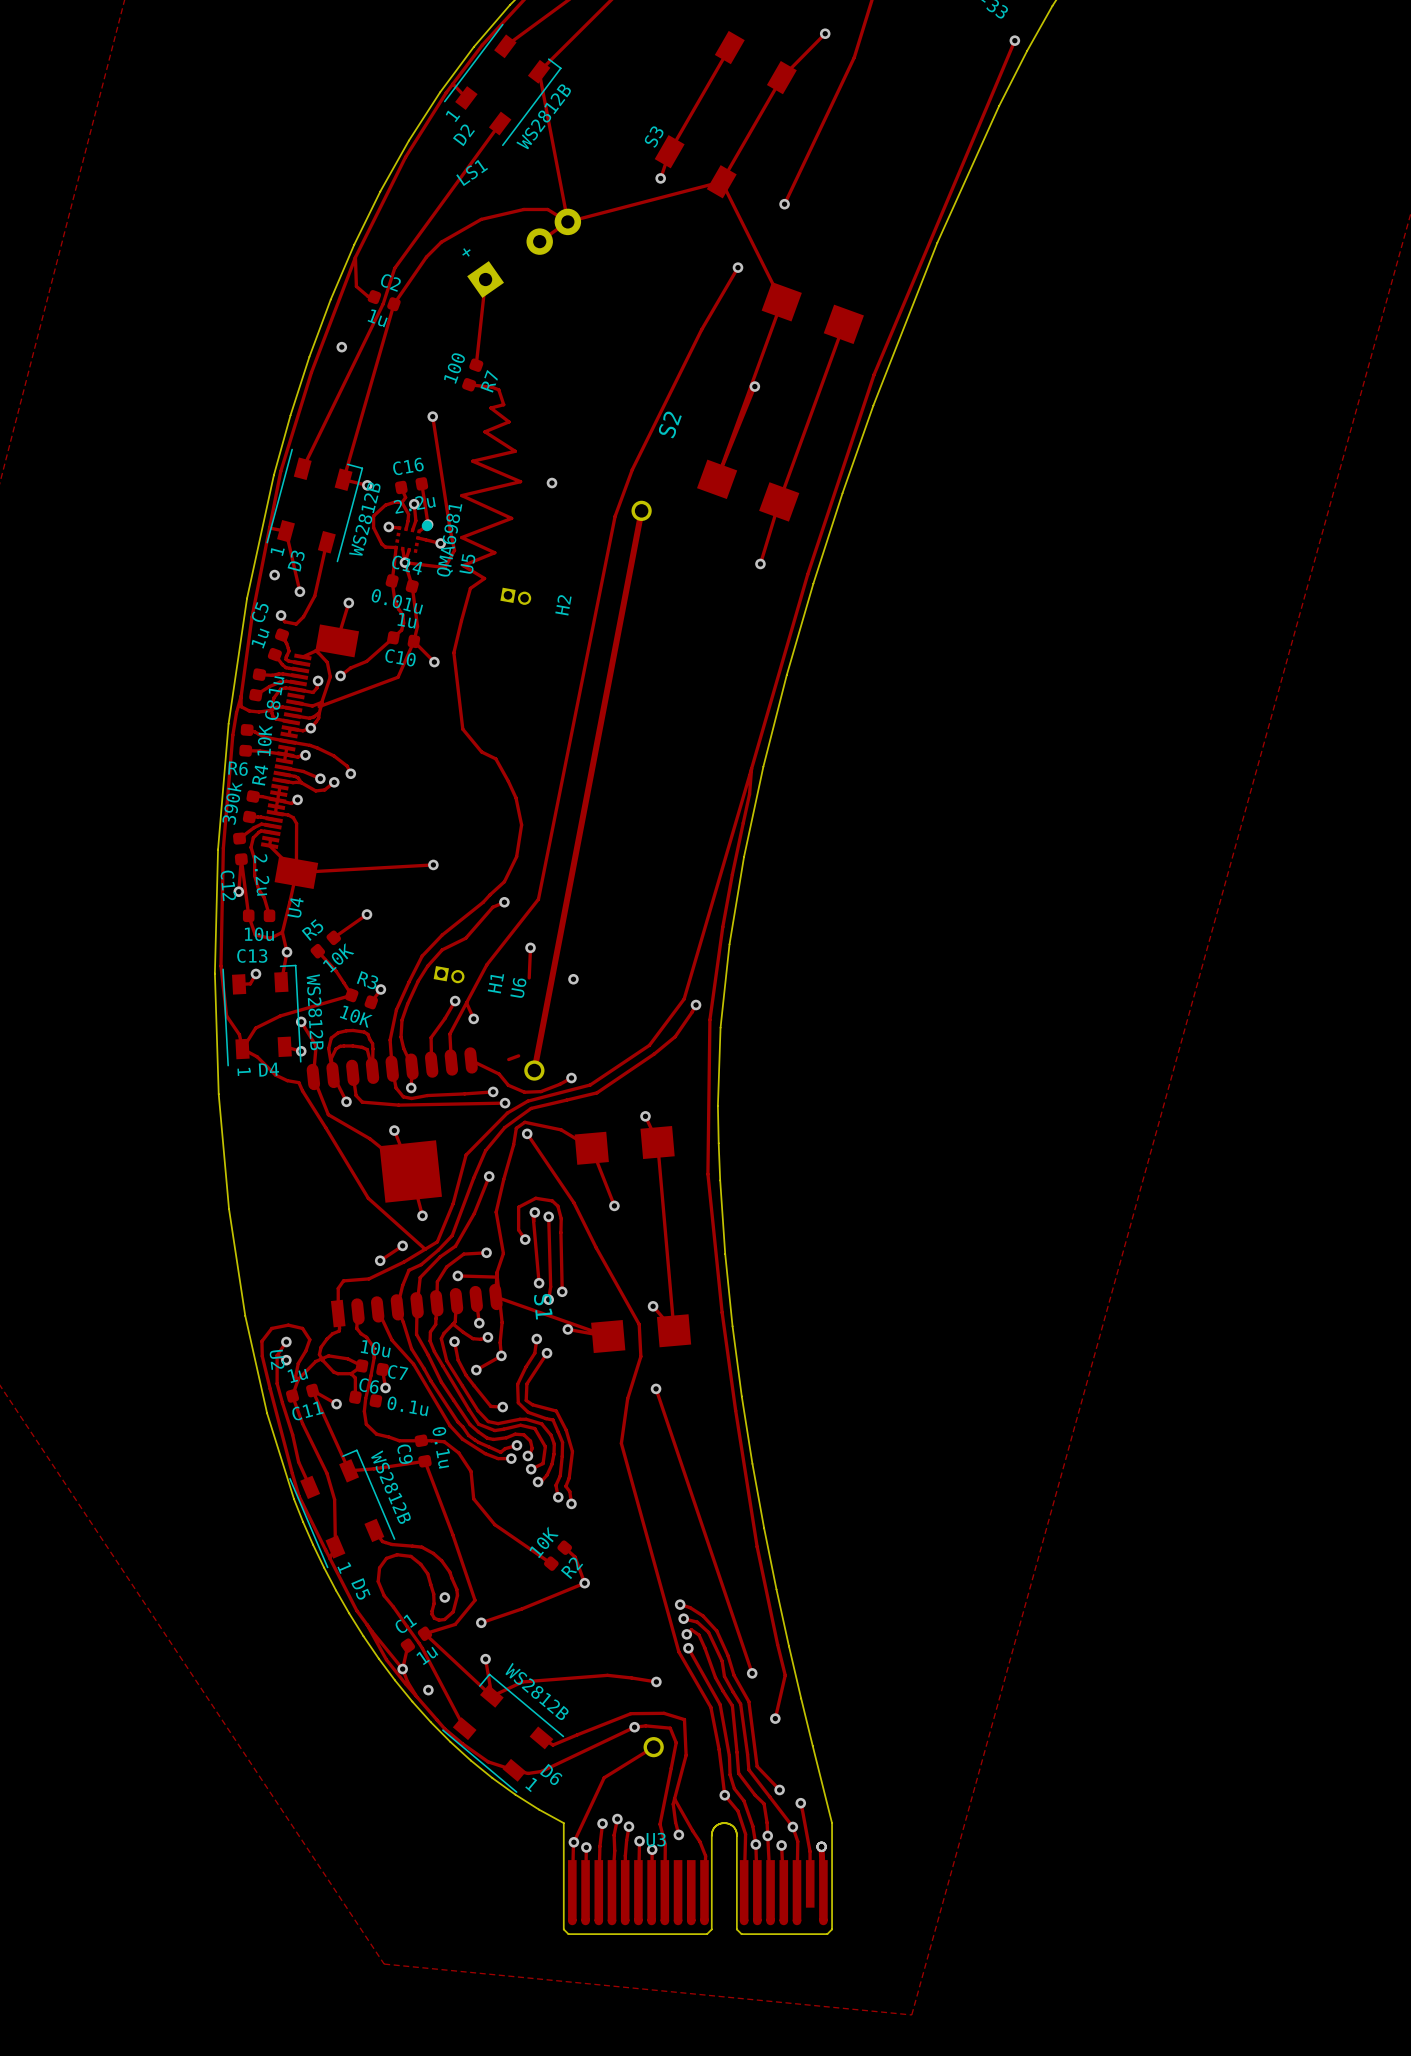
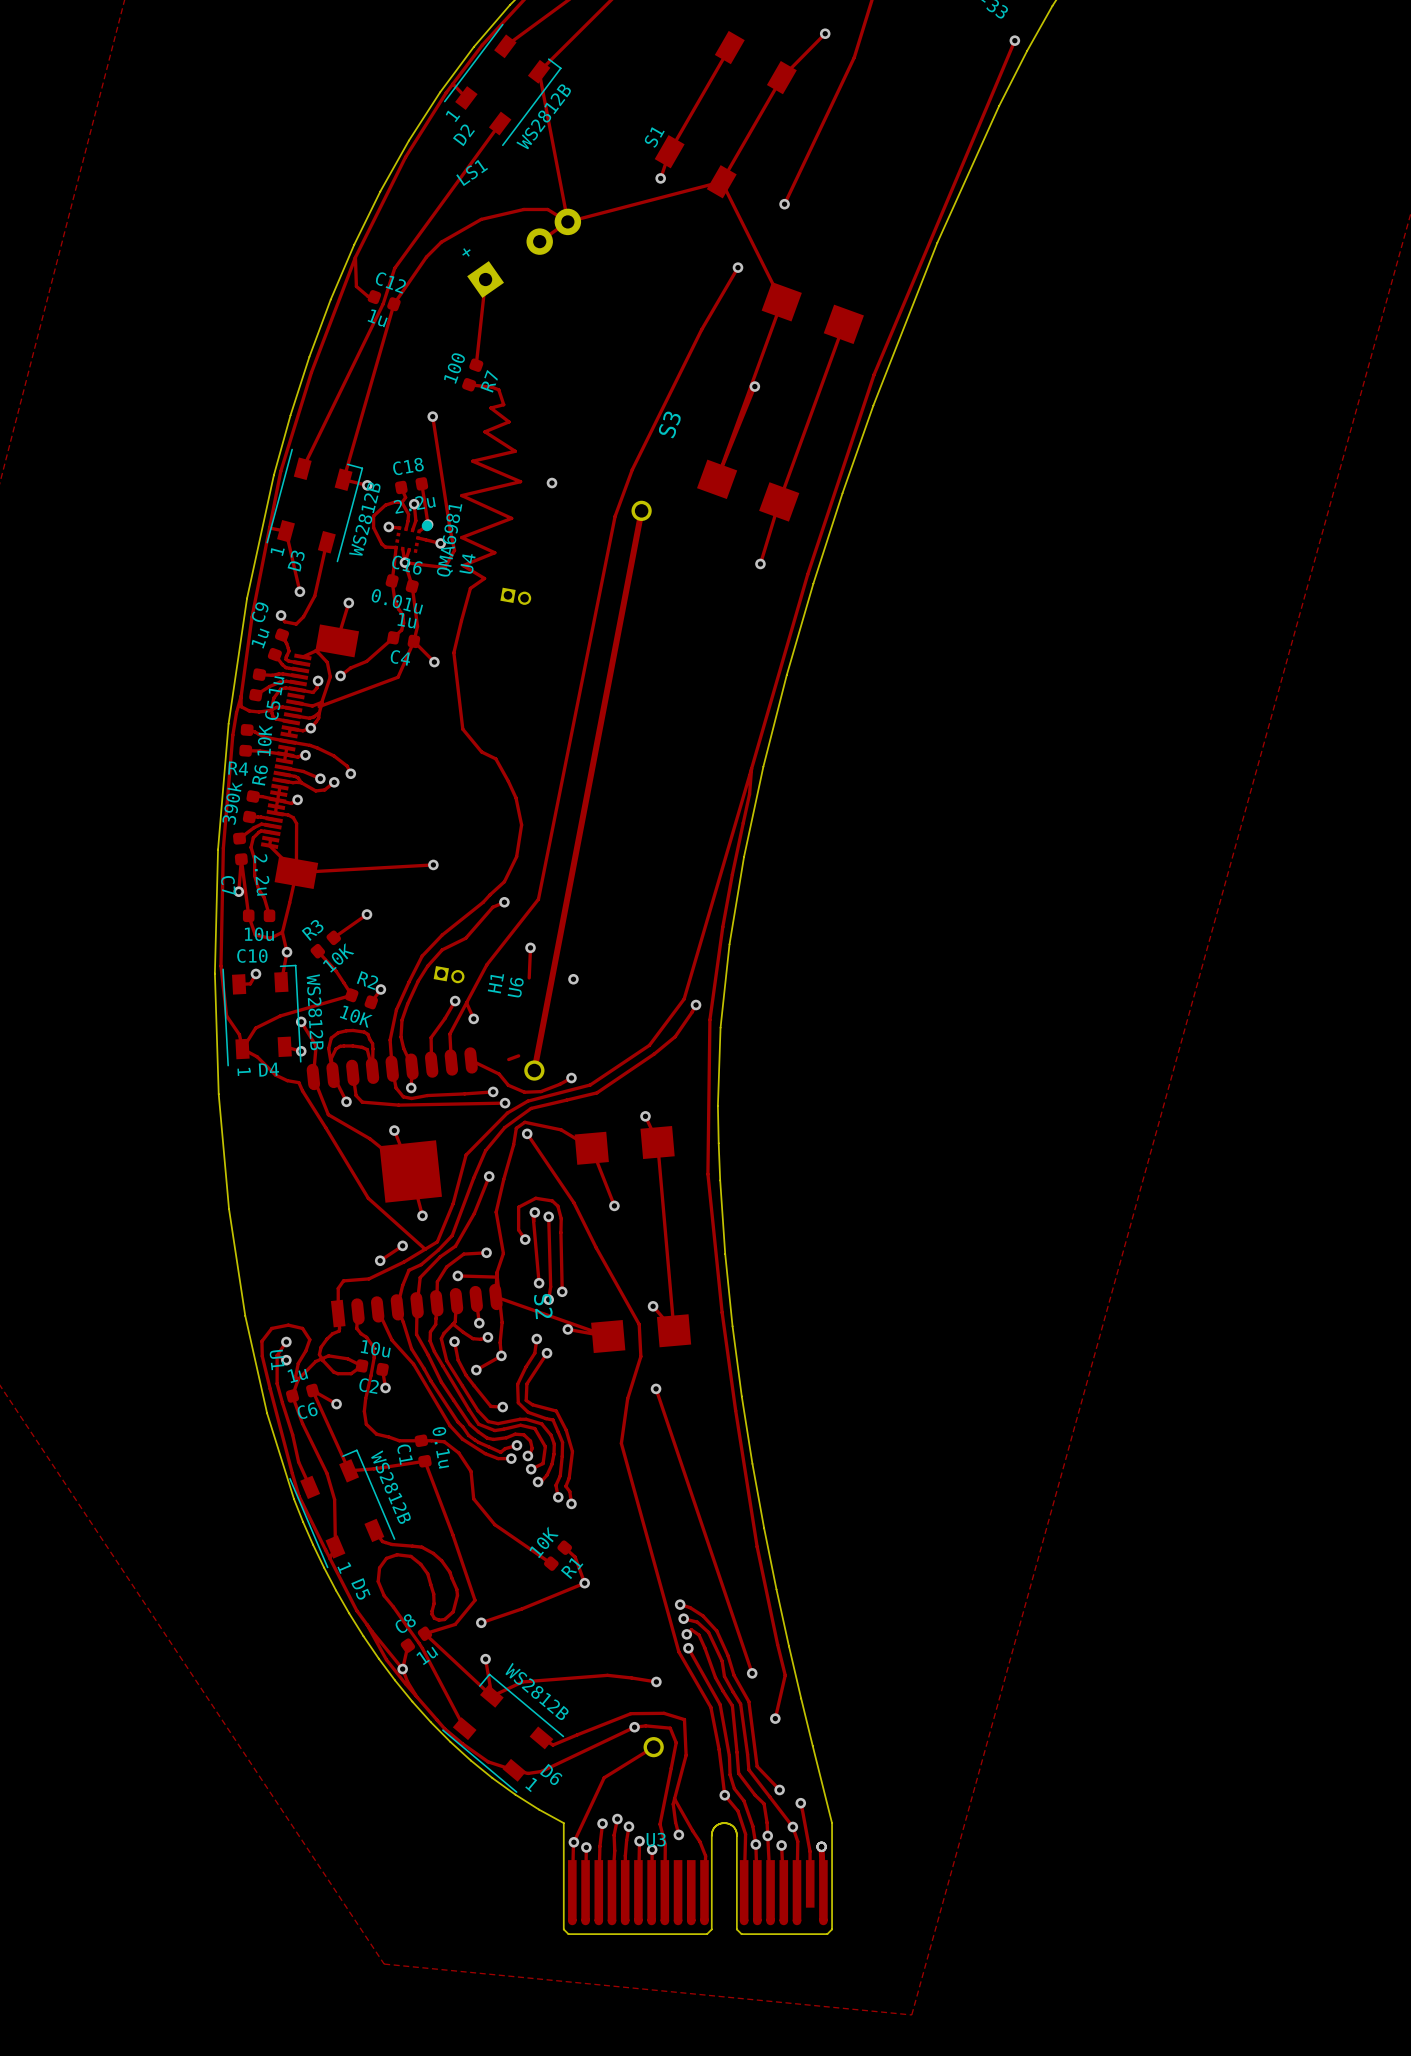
S3 name: S3 (654, 136) -> S1 (654, 137)
C2 name: C2 (390, 282) -> C12 (390, 282)
via: (341, 347) -> none
S2 name: S2 (670, 424) -> S3 (669, 424)
C16 name: C16 (408, 466) -> C18 (408, 466)
U5 name: U5 (467, 564) -> U4 (467, 564)
C14 name: C14 (406, 565) -> C16 (407, 565)
via: (274, 575) -> none
H2: (563, 605) -> none
C5 name: C5 (260, 612) -> C9 (260, 612)
C10 name: C10 (400, 657) -> C4 (400, 657)
C8 name: C8 (272, 710) -> C5 (272, 710)
R6 name: R6 (237, 768) -> R4 (238, 768)
R4 name: R4 (260, 775) -> R6 (260, 775)
C12 name: C12 (228, 885) -> C7 (228, 885)
U4 name: U4 (295, 907) -> U6 (515, 987)
R5 name: R5 (312, 930) -> R3 (312, 930)
C13 name: C13 (252, 955) -> C10 (252, 955)
R3 name: R3 (367, 980) -> R2 (367, 980)
U6: (518, 988) -> none
S1 name: S1 (543, 1306) -> S2 (543, 1306)
U2 name: U2 (277, 1359) -> U1 (277, 1359)
track: (351, 1373) (355, 1377) (355, 1397) -> none
C6 name: C6 (368, 1385) -> C2 (369, 1385)
C7: 0.1u (365, 1399) -> none
C11 name: C11 (307, 1411) -> C6 (307, 1410)
C9 name: C9 (405, 1454) -> C1 (404, 1454)
R2 name: R2 (572, 1568) -> R1 (572, 1568)
via: (444, 1597) -> none
C1 name: C1 (406, 1623) -> C8 (405, 1623)
via: (428, 1690) -> none

